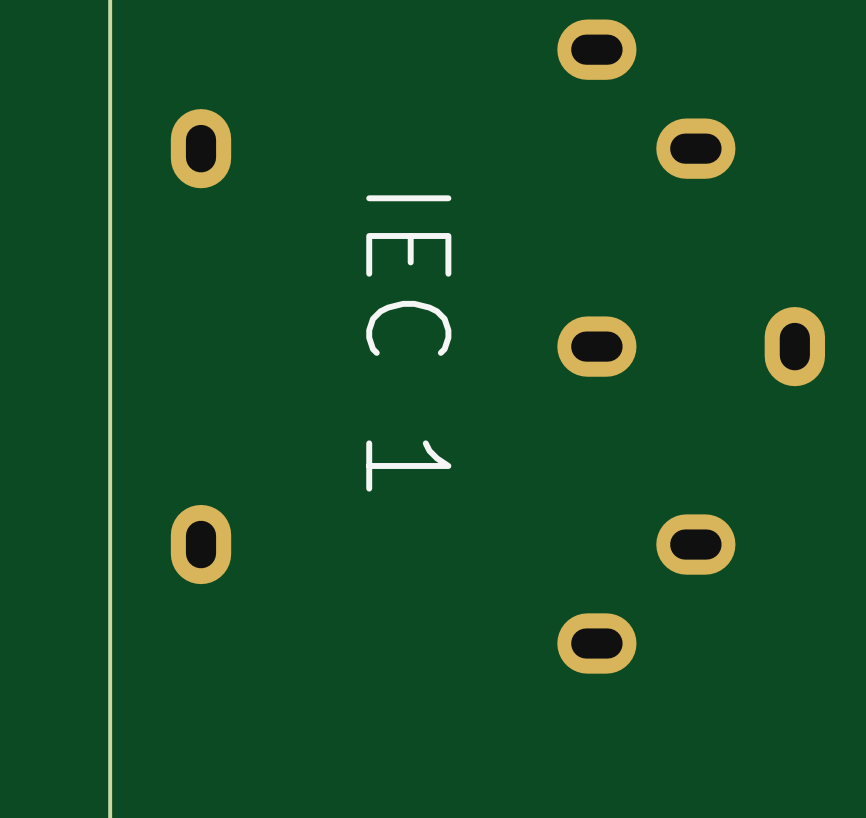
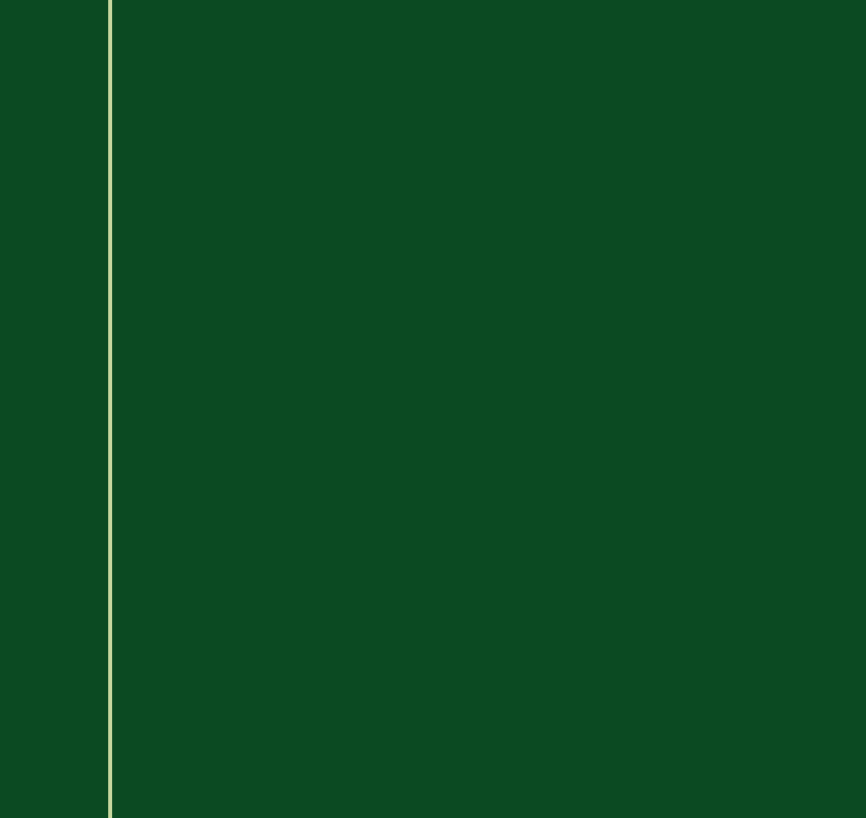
IEC 1: (497, 346) -> none

